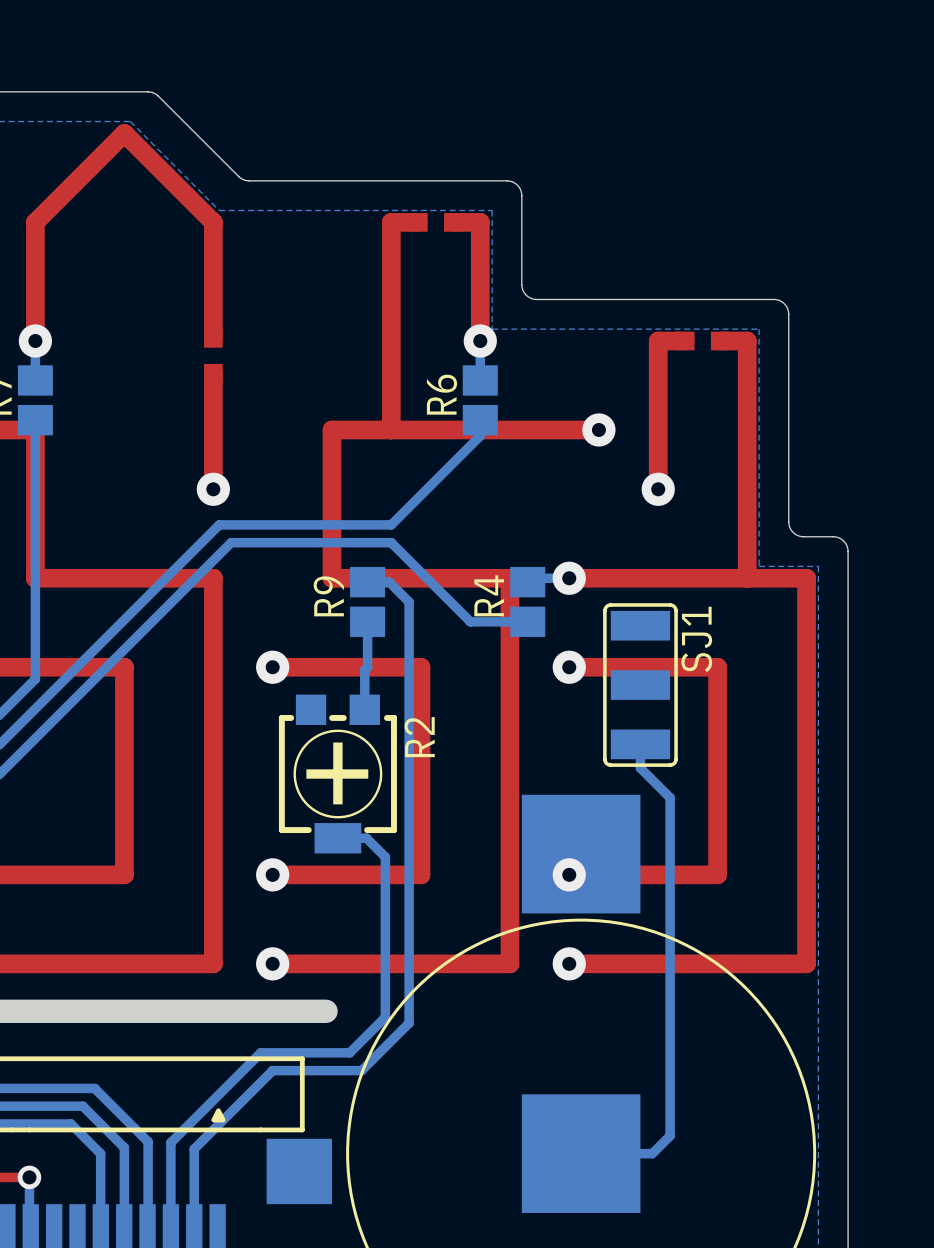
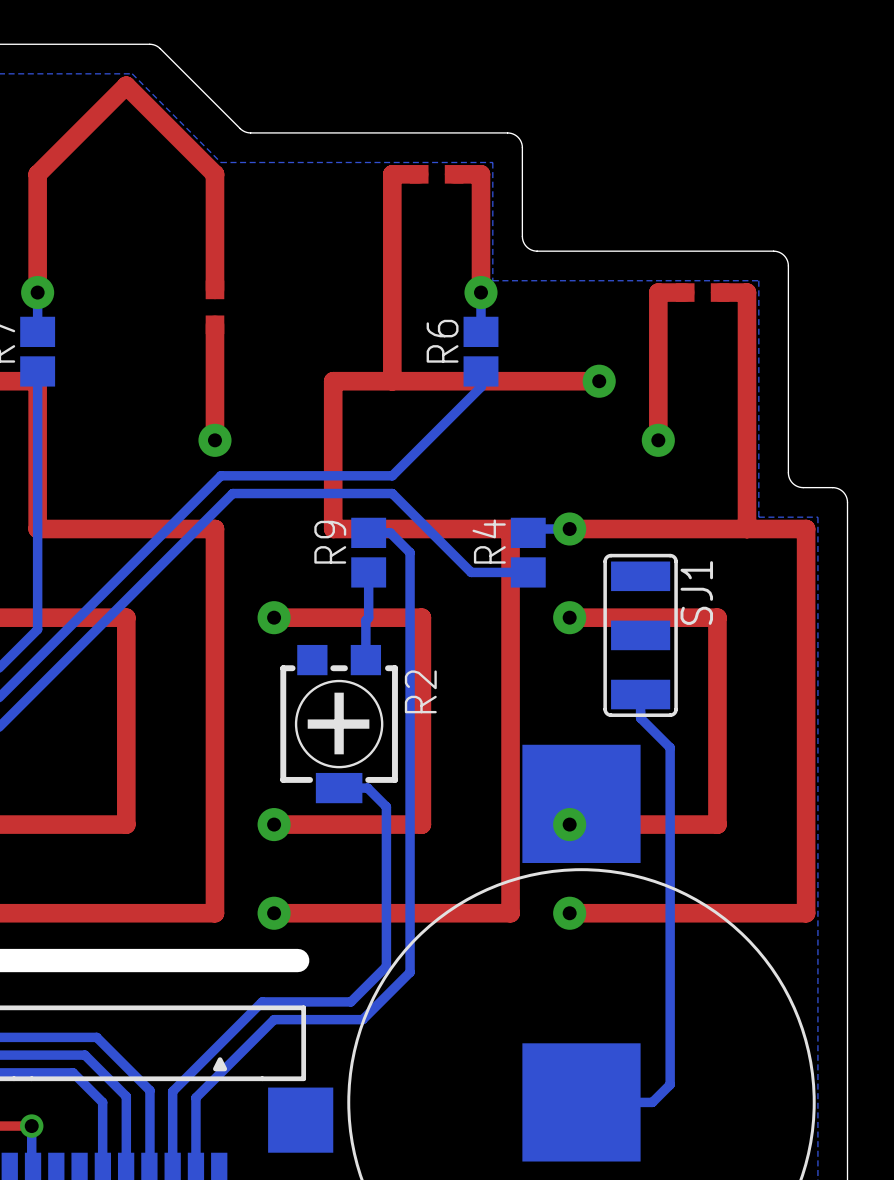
board edge: (326, 1011) (296, 1011) -> none

